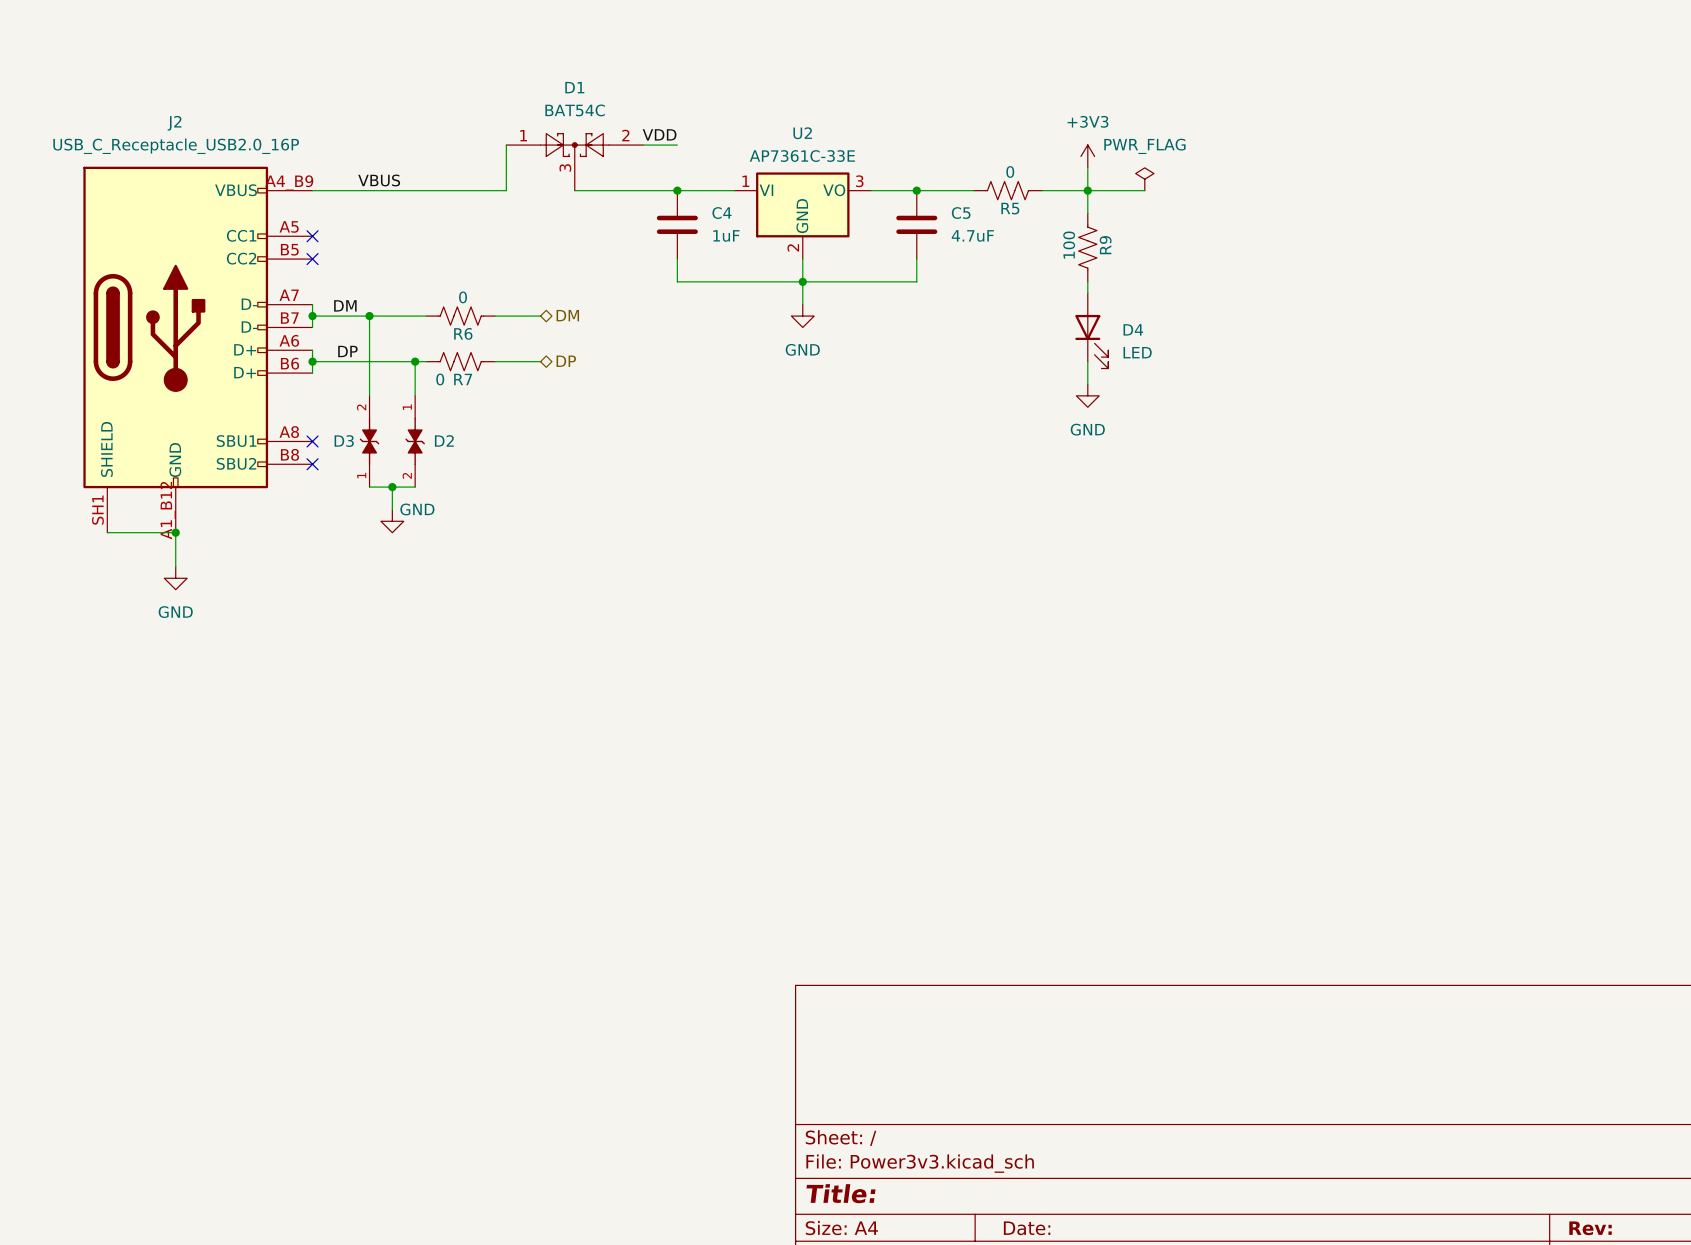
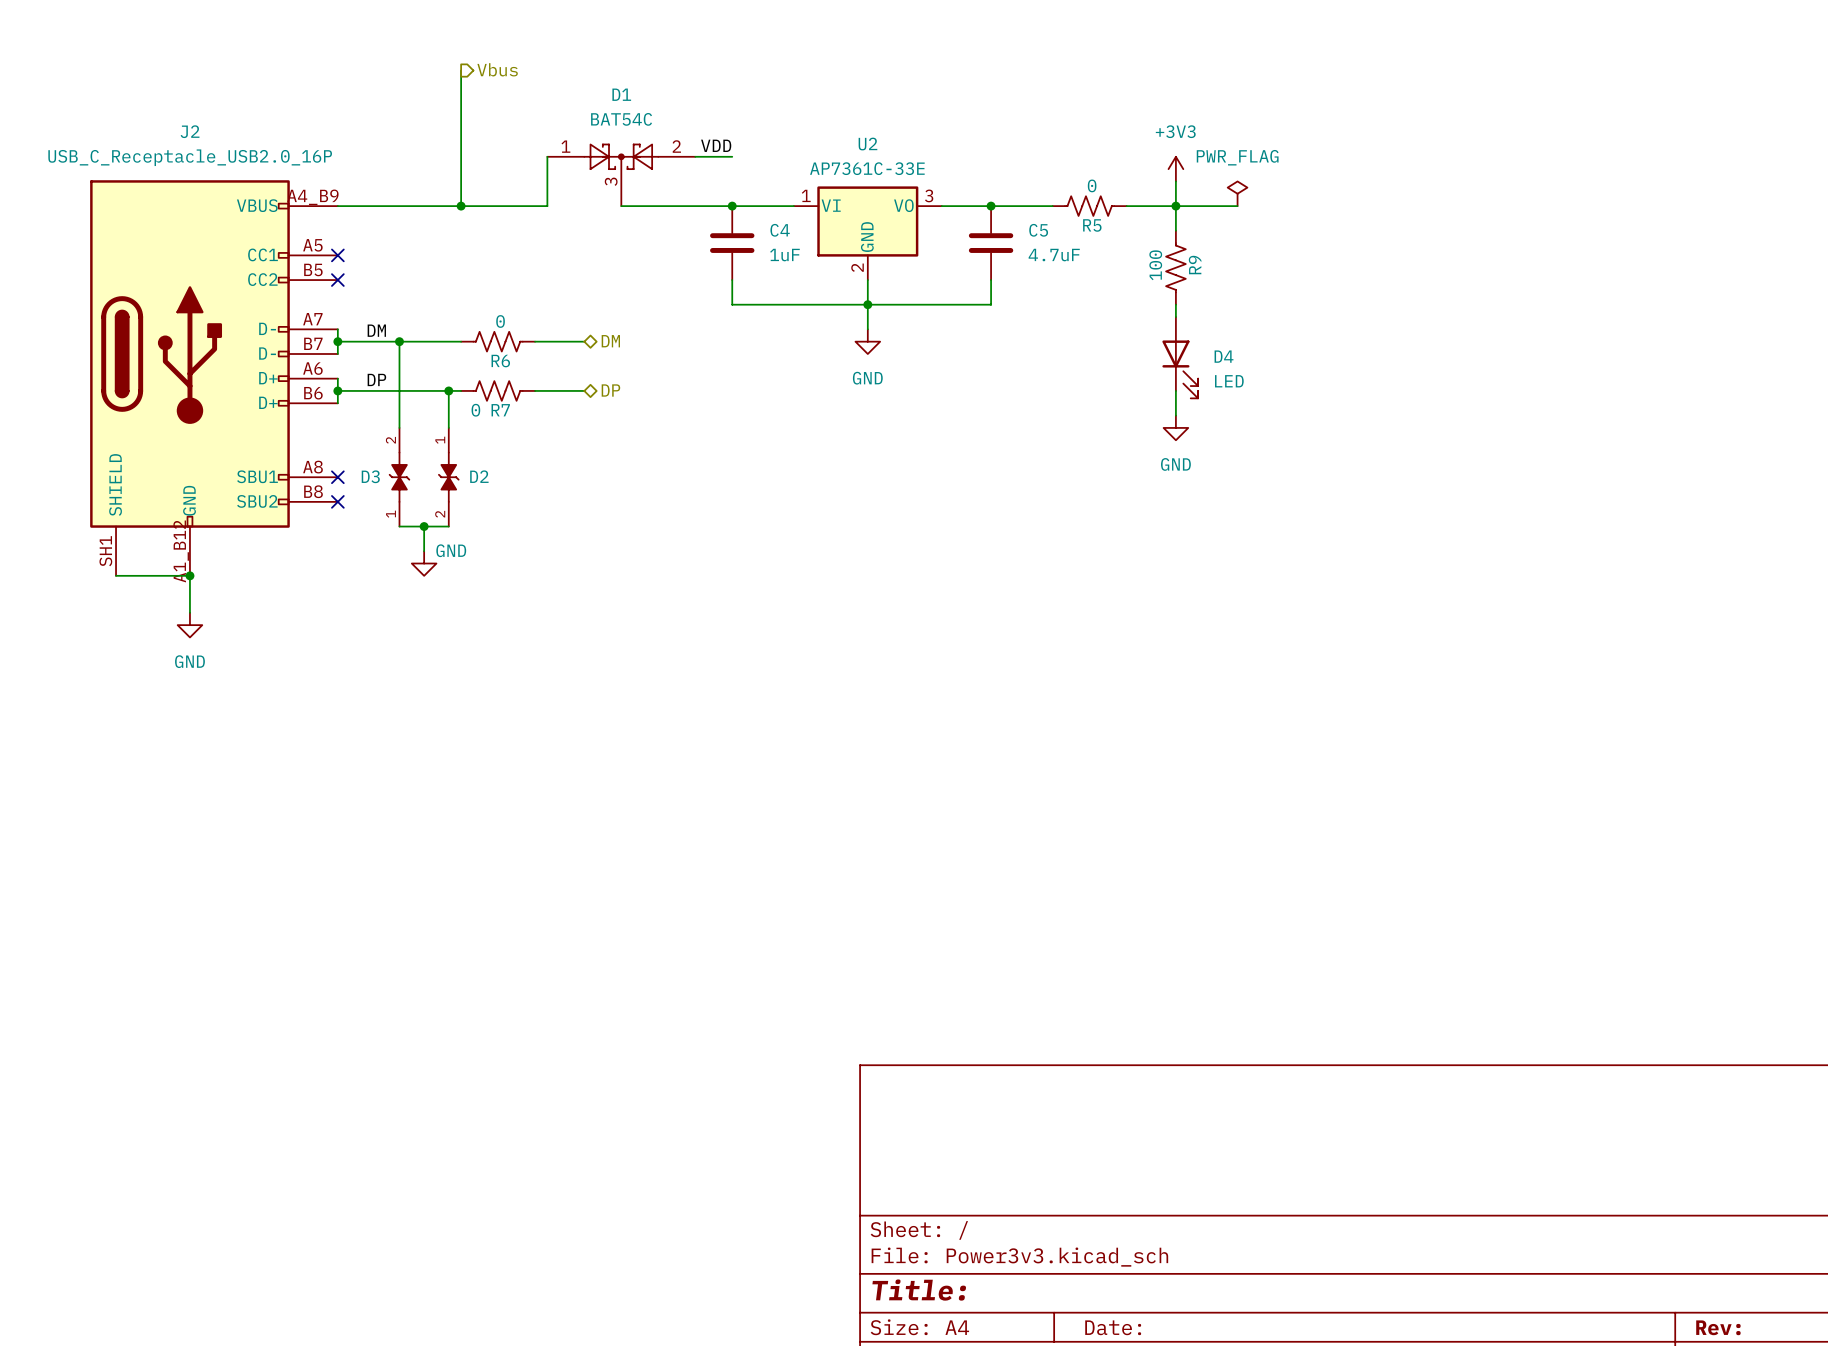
hierarchical label: none -> Vbus (497, 69)
wire: none -> (461, 70) (461, 206)
label: VBUS (379, 180) -> none
junction: none -> (461, 206)

